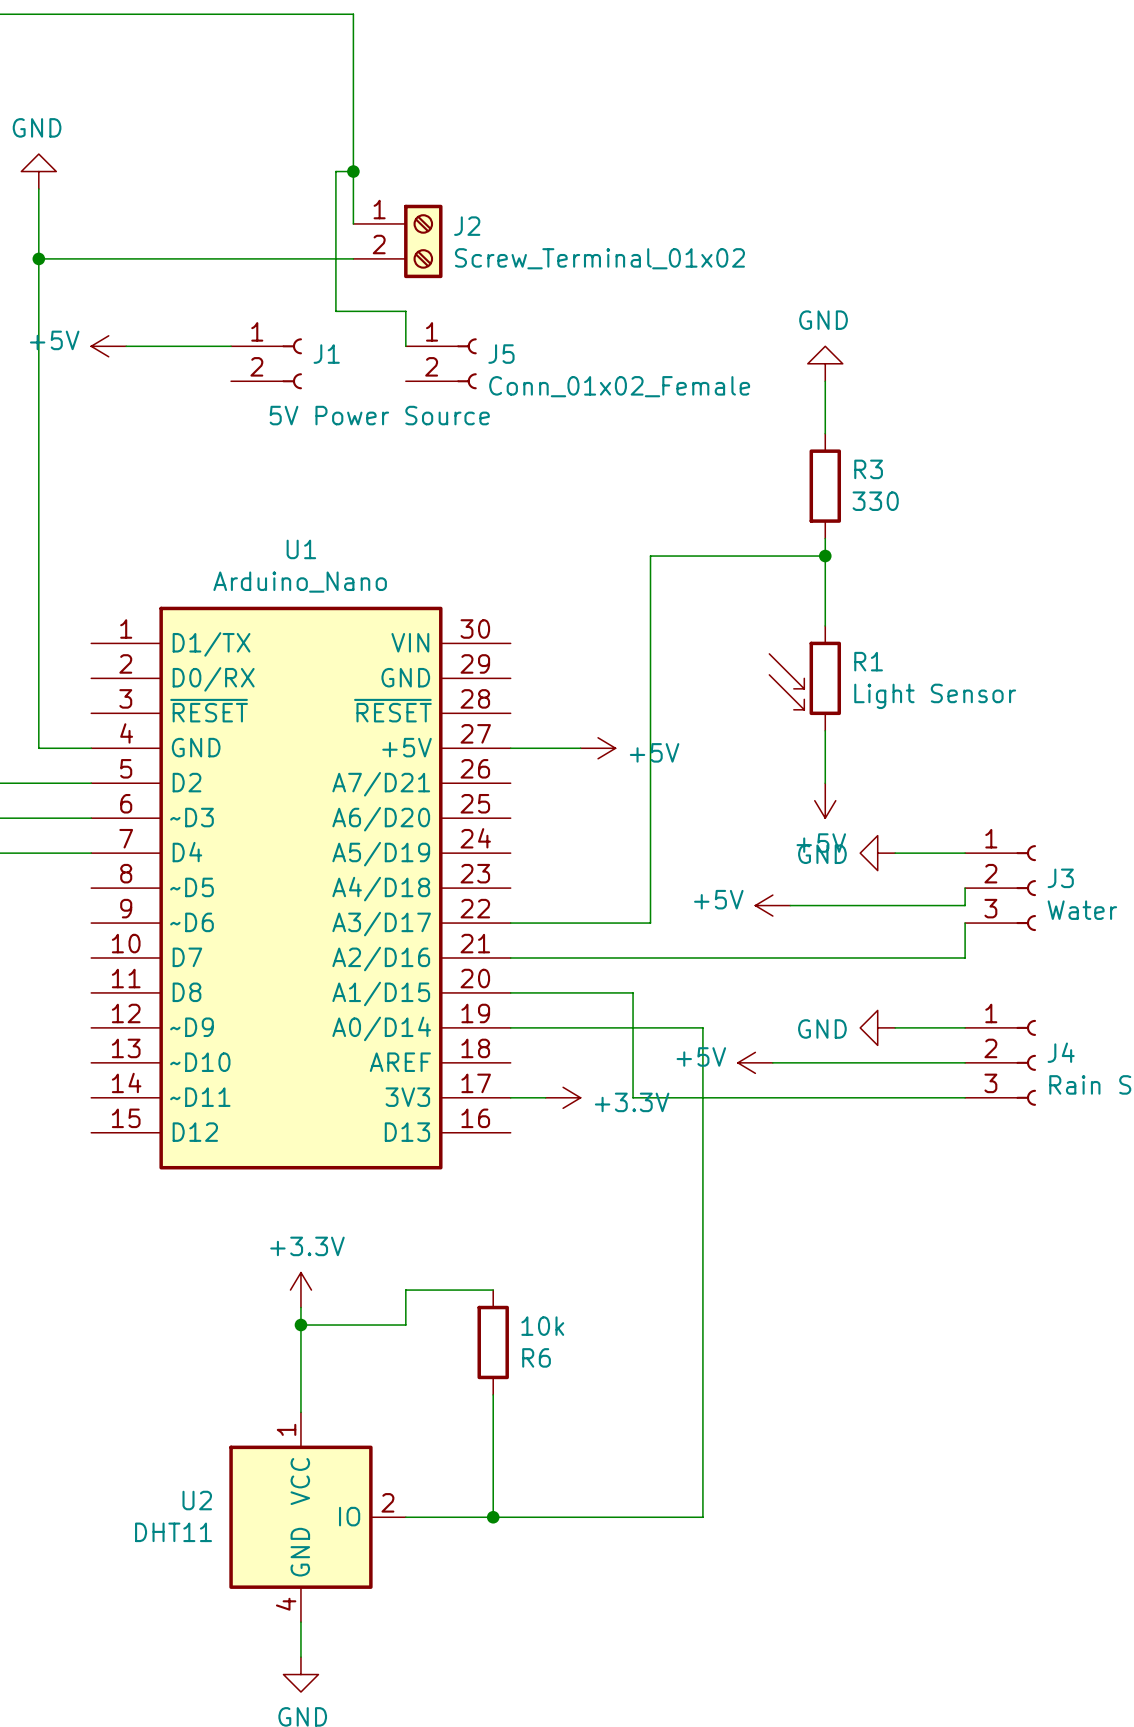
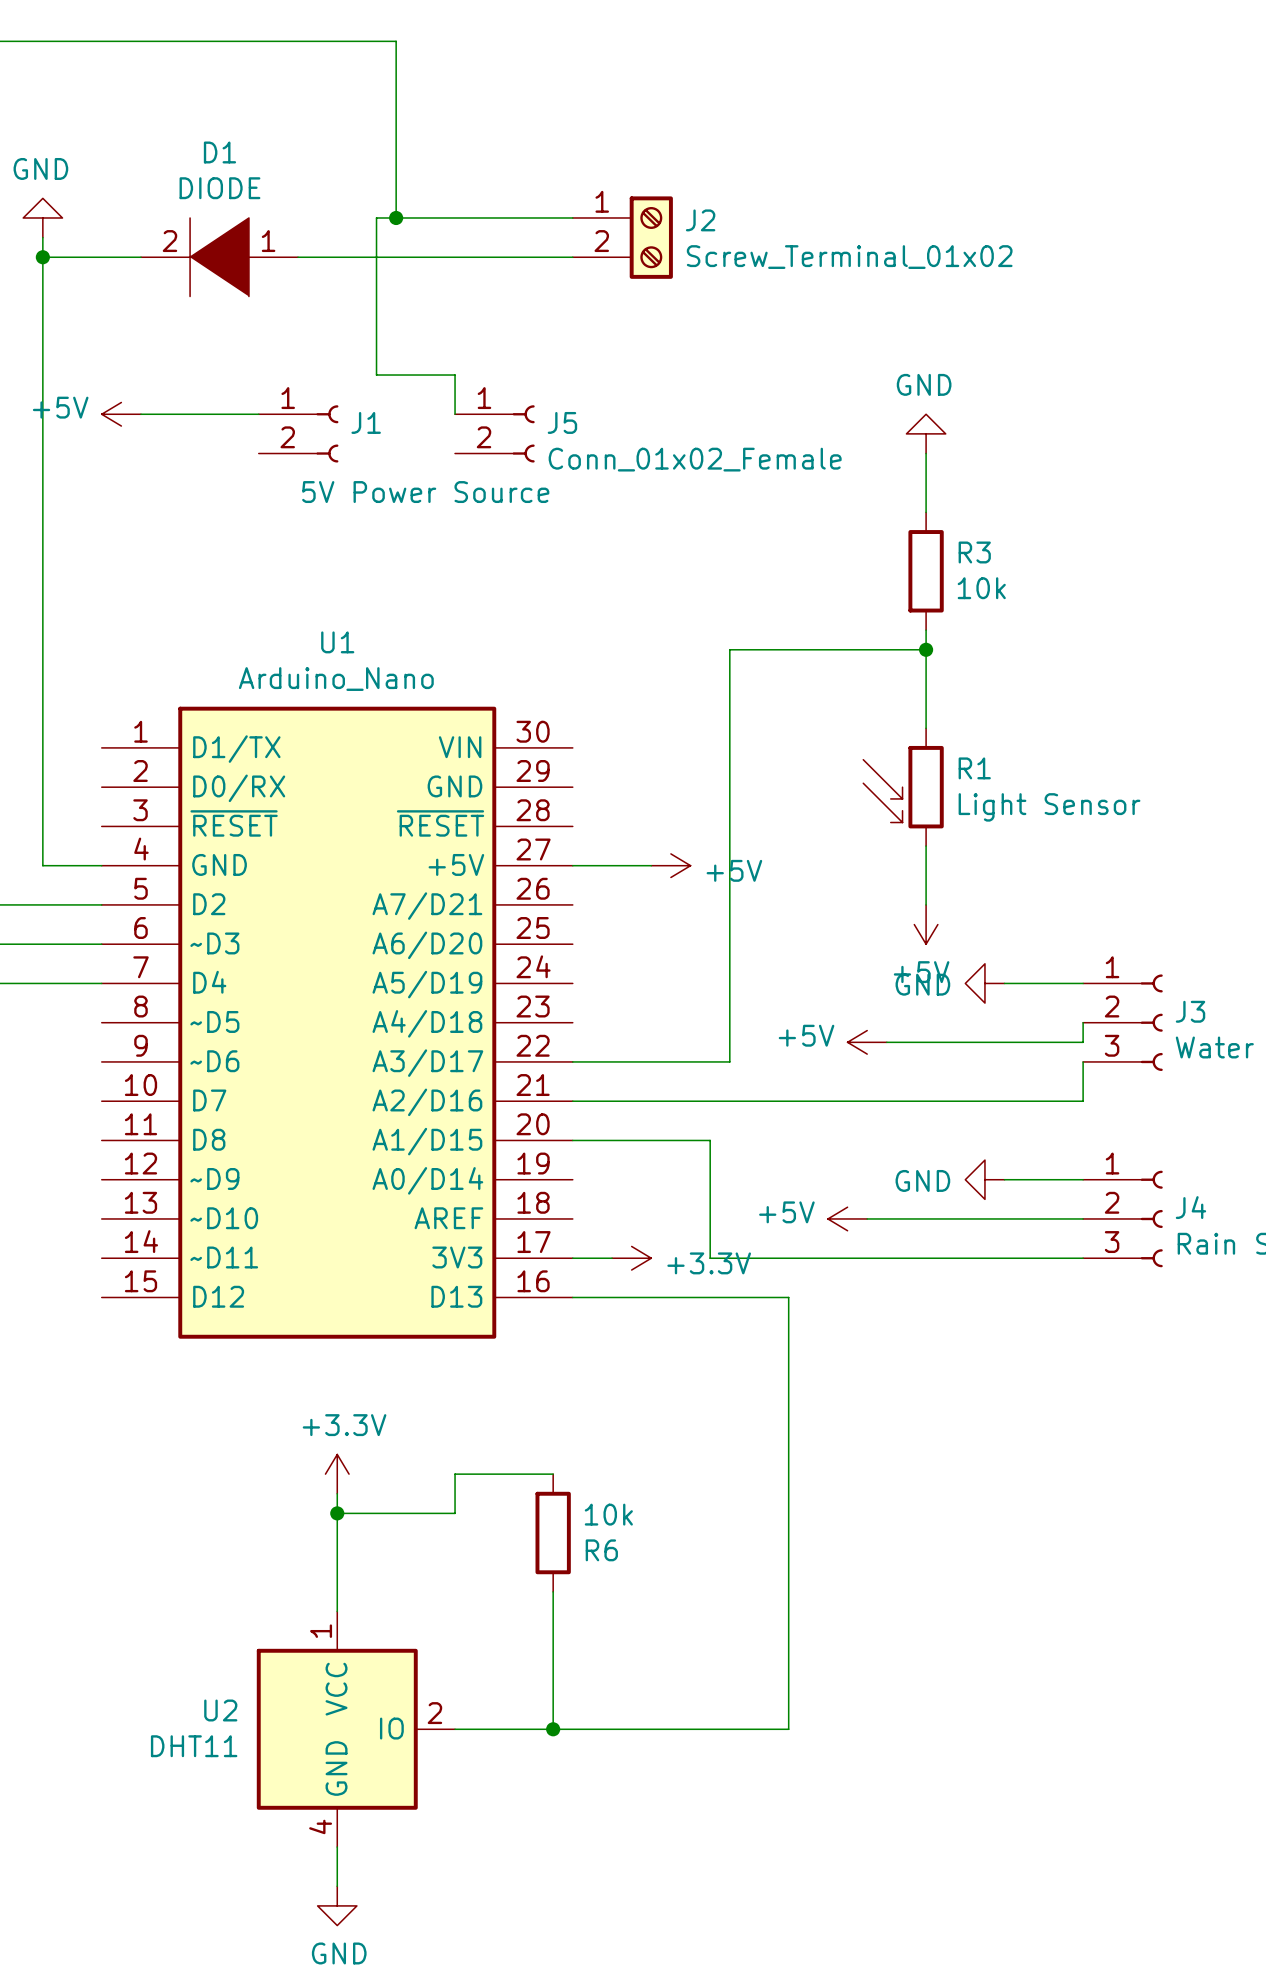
wire: (353, 171) (353, 223) -> (396, 217) (572, 217)
wire: none -> (42, 257) (140, 257)
D1: none -> DIODE (219, 257)
wire: none -> (298, 257) (572, 257)
J2 position: (397, 241) -> (622, 237)
wire: (38, 258) (353, 258) -> none
junction position: (38, 258) -> (42, 257)
R3 value: 330 (875, 501) -> 10k (981, 588)
wire: (510, 1027) (702, 1027) (702, 1132) -> (572, 1297) (788, 1297)

